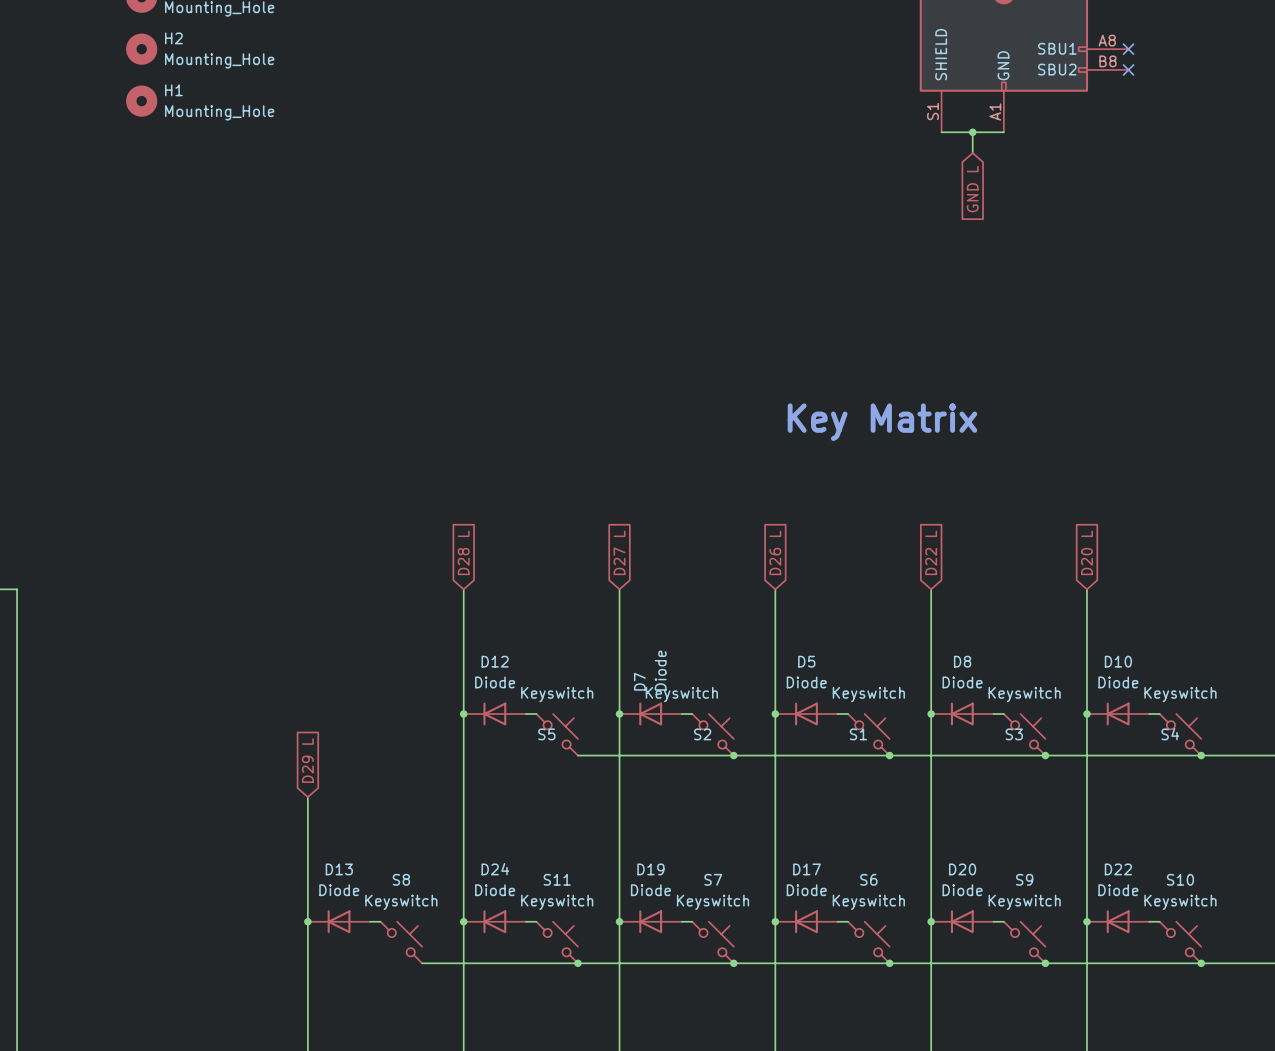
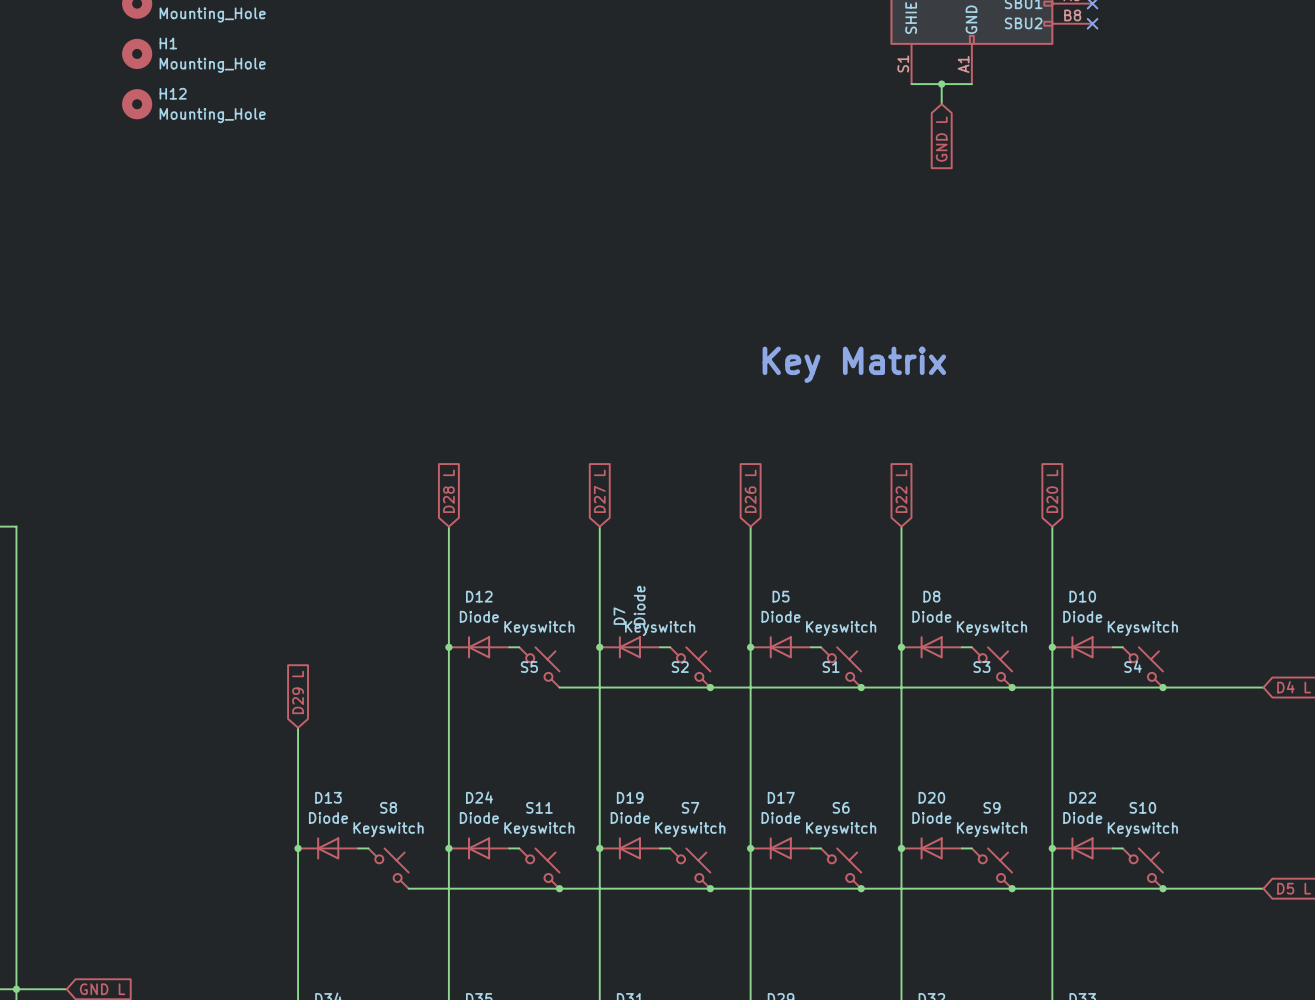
H12: none -> Mounting_Hole (137, 104)

